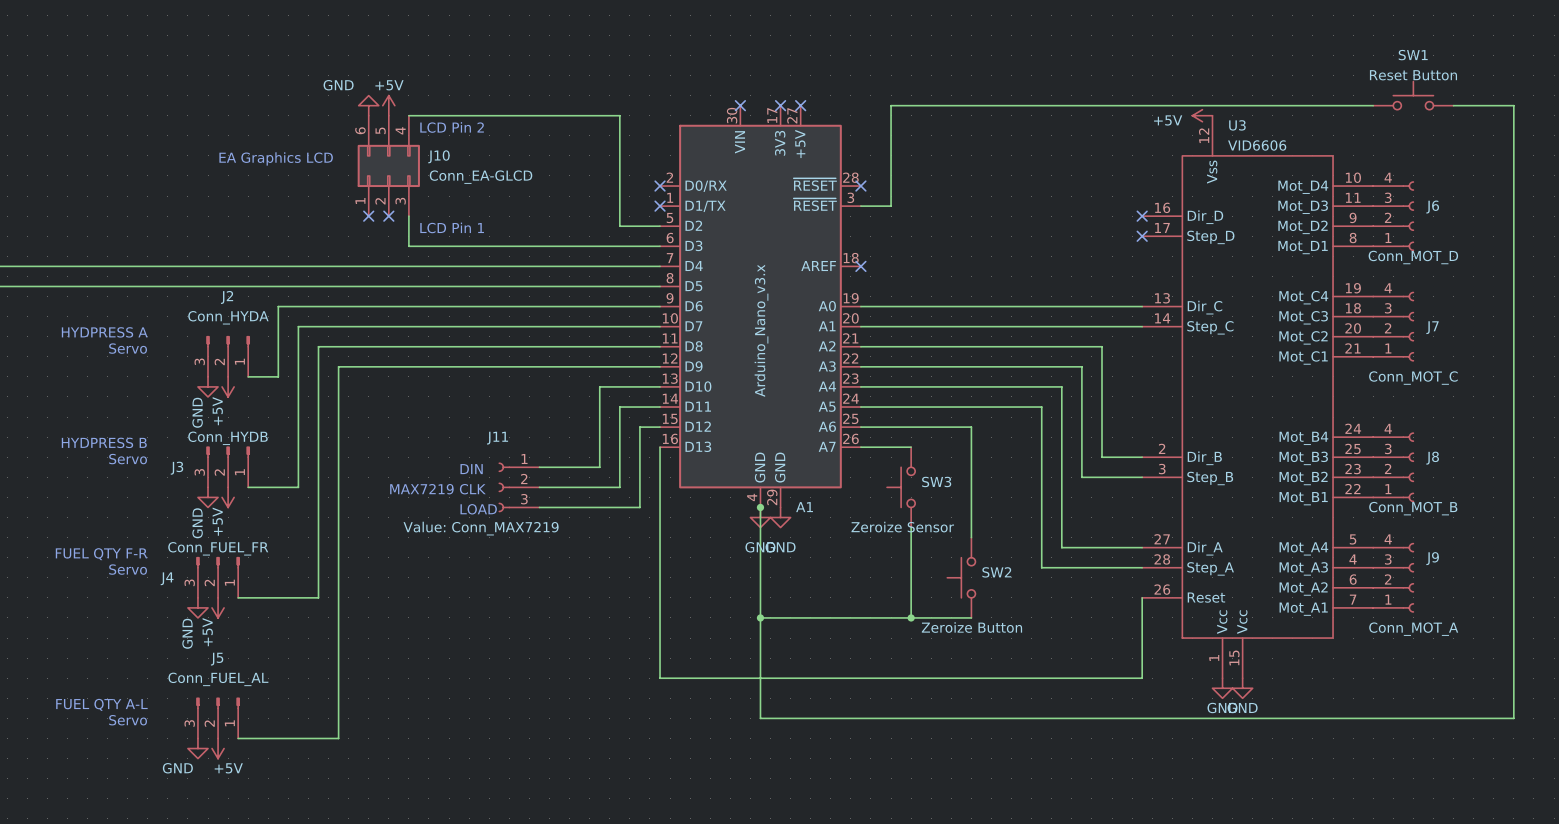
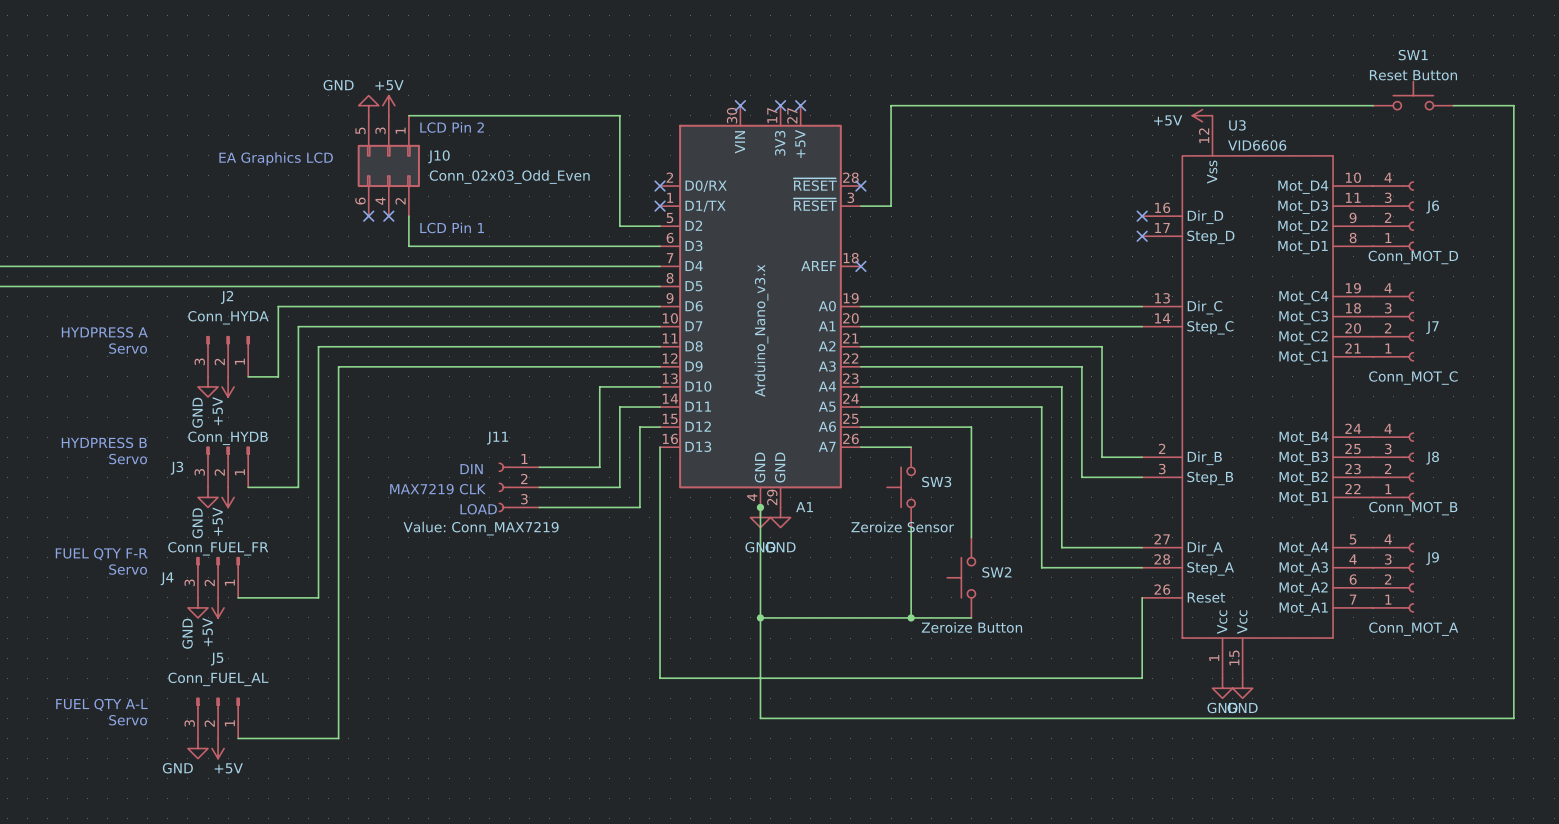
J10 pin number: 6 (360, 130) -> 5 (360, 130)
J10 pin number: 5 (380, 130) -> 3 (380, 130)
J10 pin number: 4 (400, 130) -> 1 (400, 130)
J10 value: Conn_EA-GLCD (481, 177) -> Conn_02x03_Odd_Even (509, 177)
J10 pin number: 1 (360, 200) -> 6 (360, 201)
J10 pin number: 2 (380, 201) -> 4 (380, 201)
J10 pin number: 3 (400, 201) -> 2 (400, 201)

